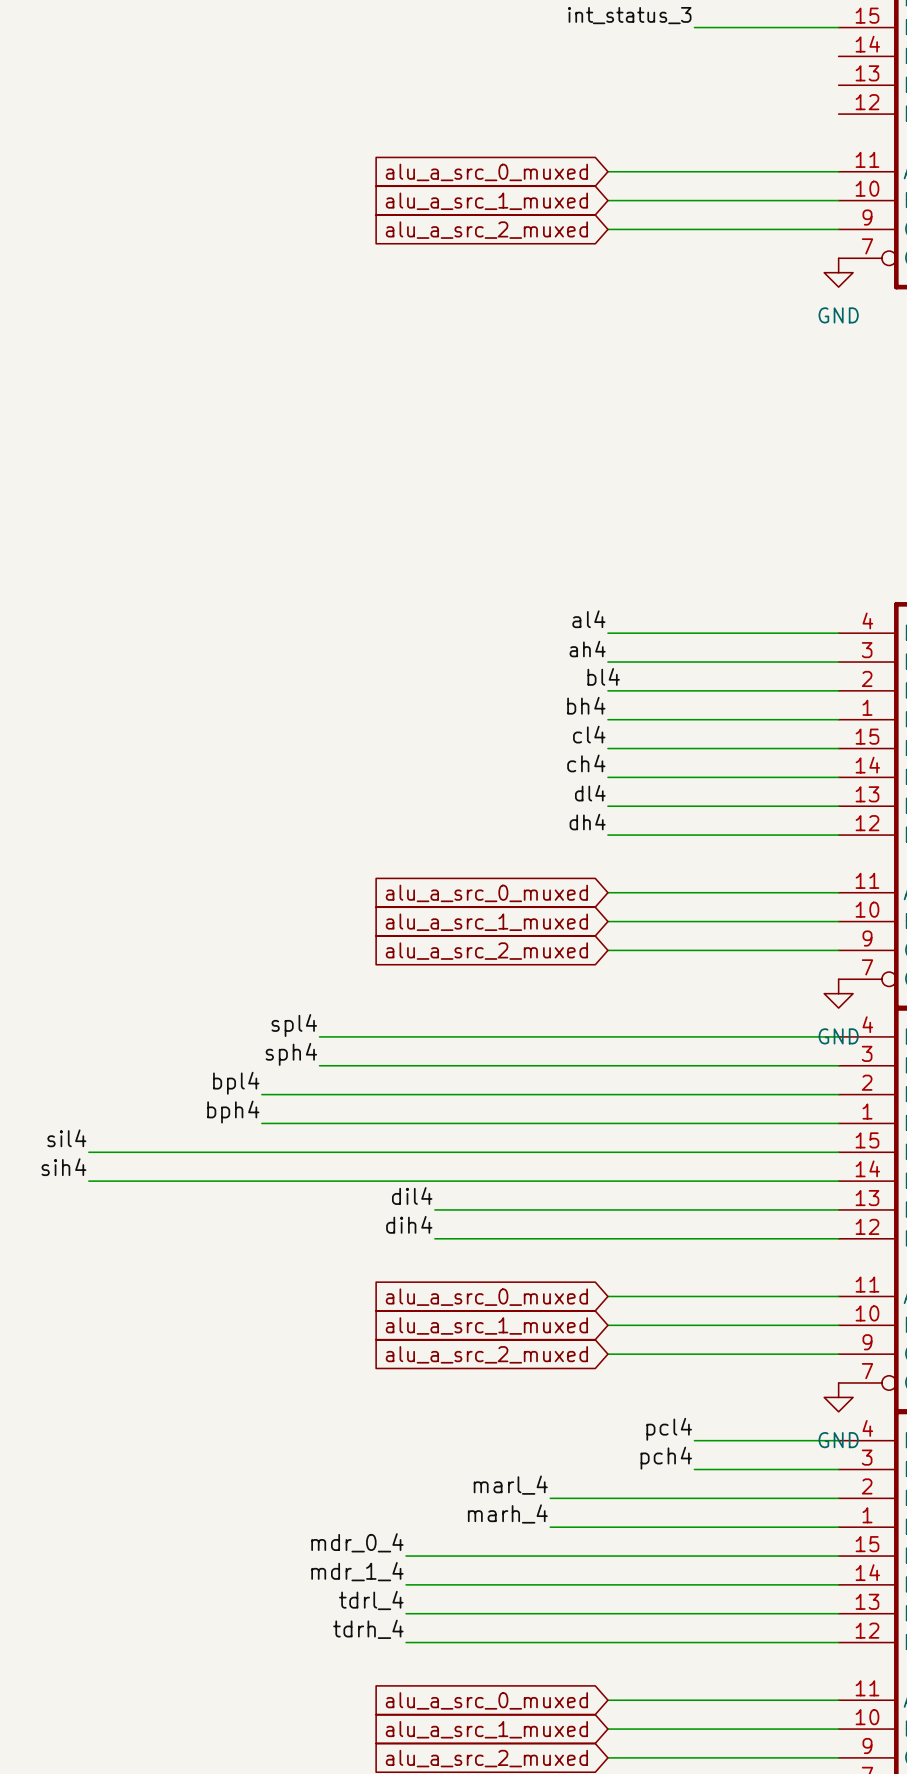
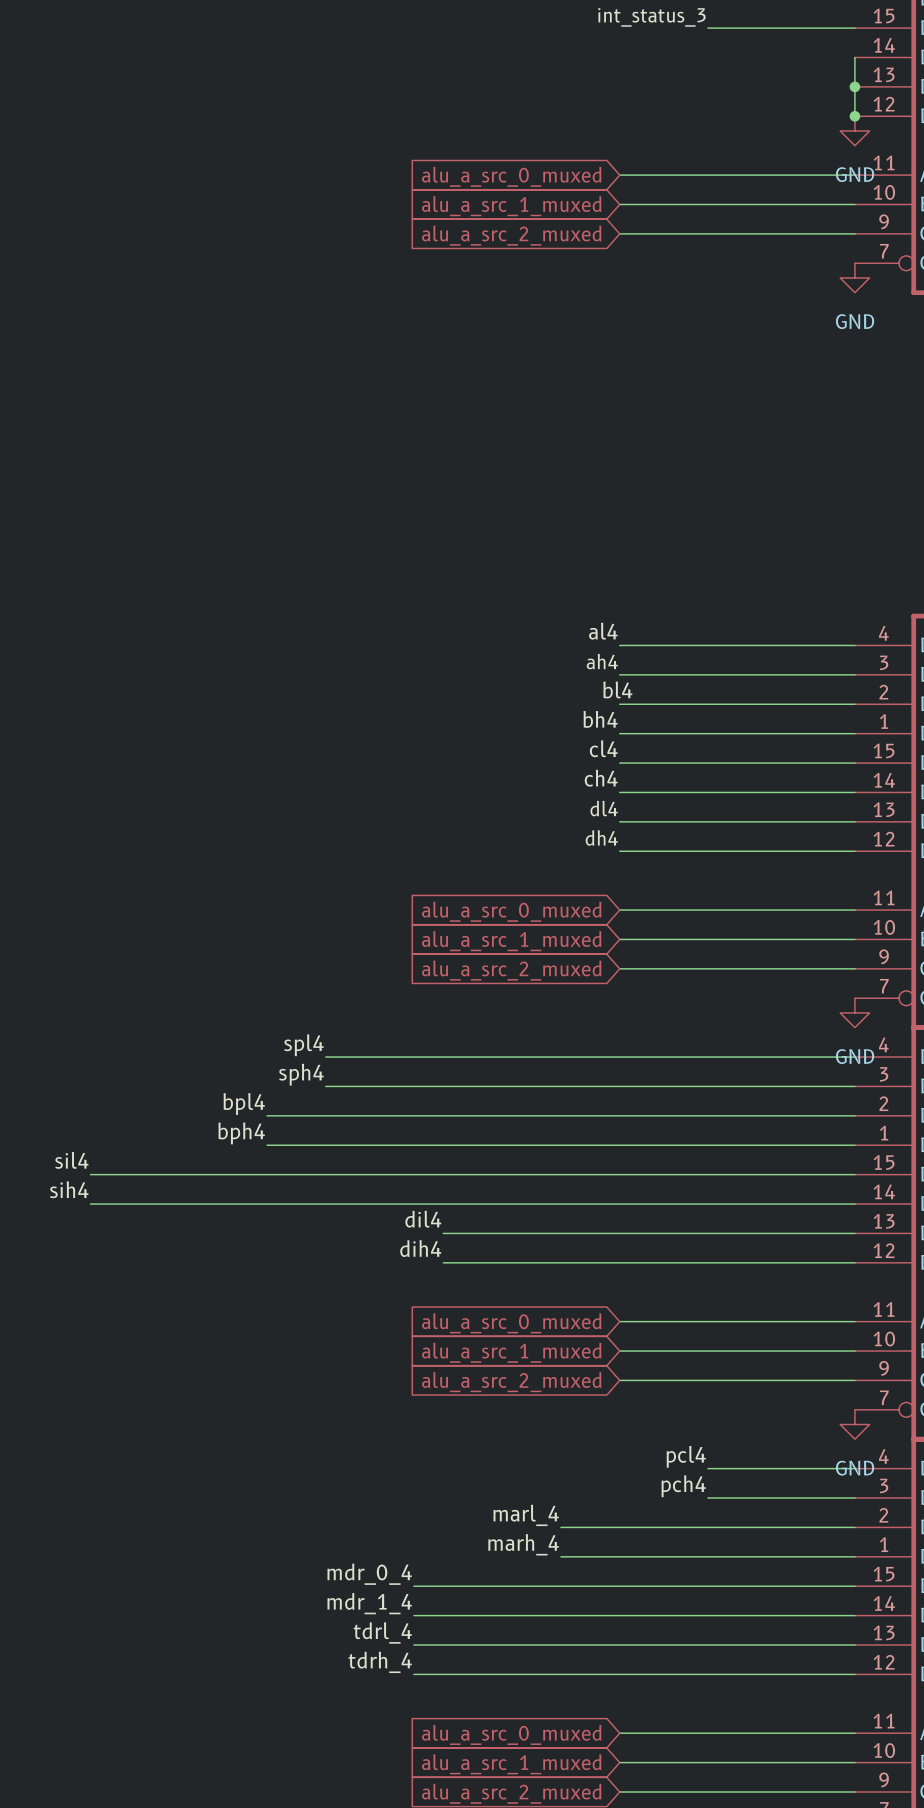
wire: none -> (854, 57) (854, 116)
junction: none -> (854, 86)
junction: none -> (854, 116)
power symbol: none -> GND (854, 130)

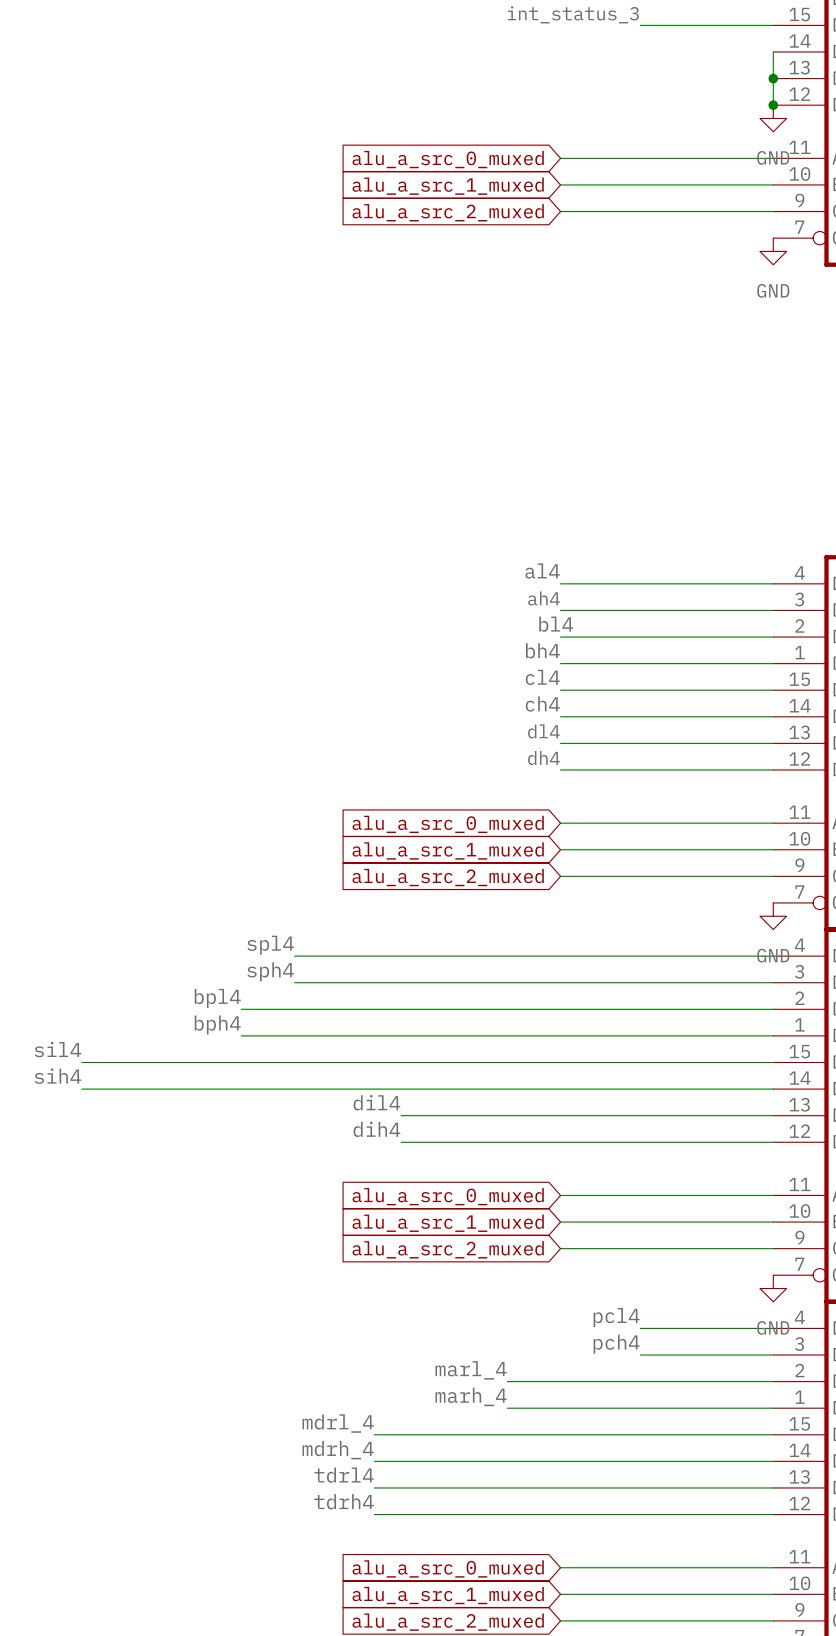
label: mdr_0_4 (369, 1574) -> mdrl_4 (338, 1423)
label: mdr_1_4 (369, 1603) -> mdrh_4 (338, 1450)
label: tdrl_4 (382, 1632) -> tdrl4 (344, 1475)
label: tdrh_4 (380, 1662) -> tdrh4 (344, 1501)

